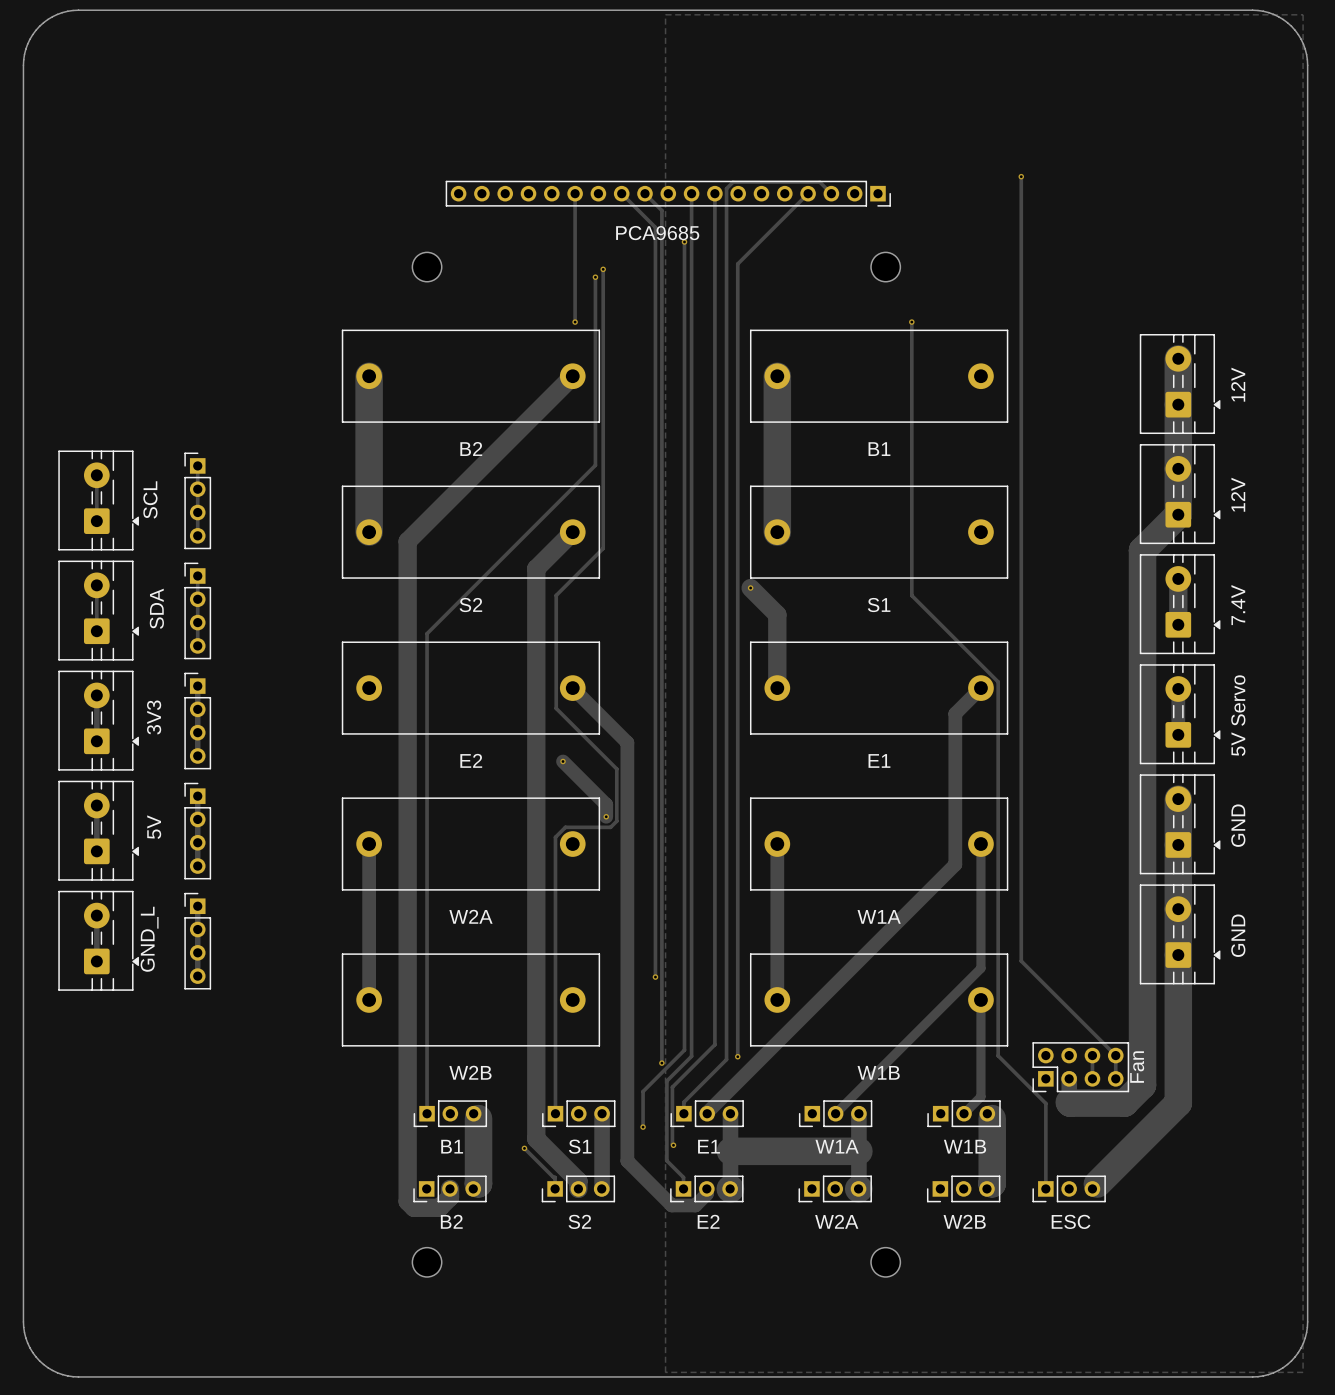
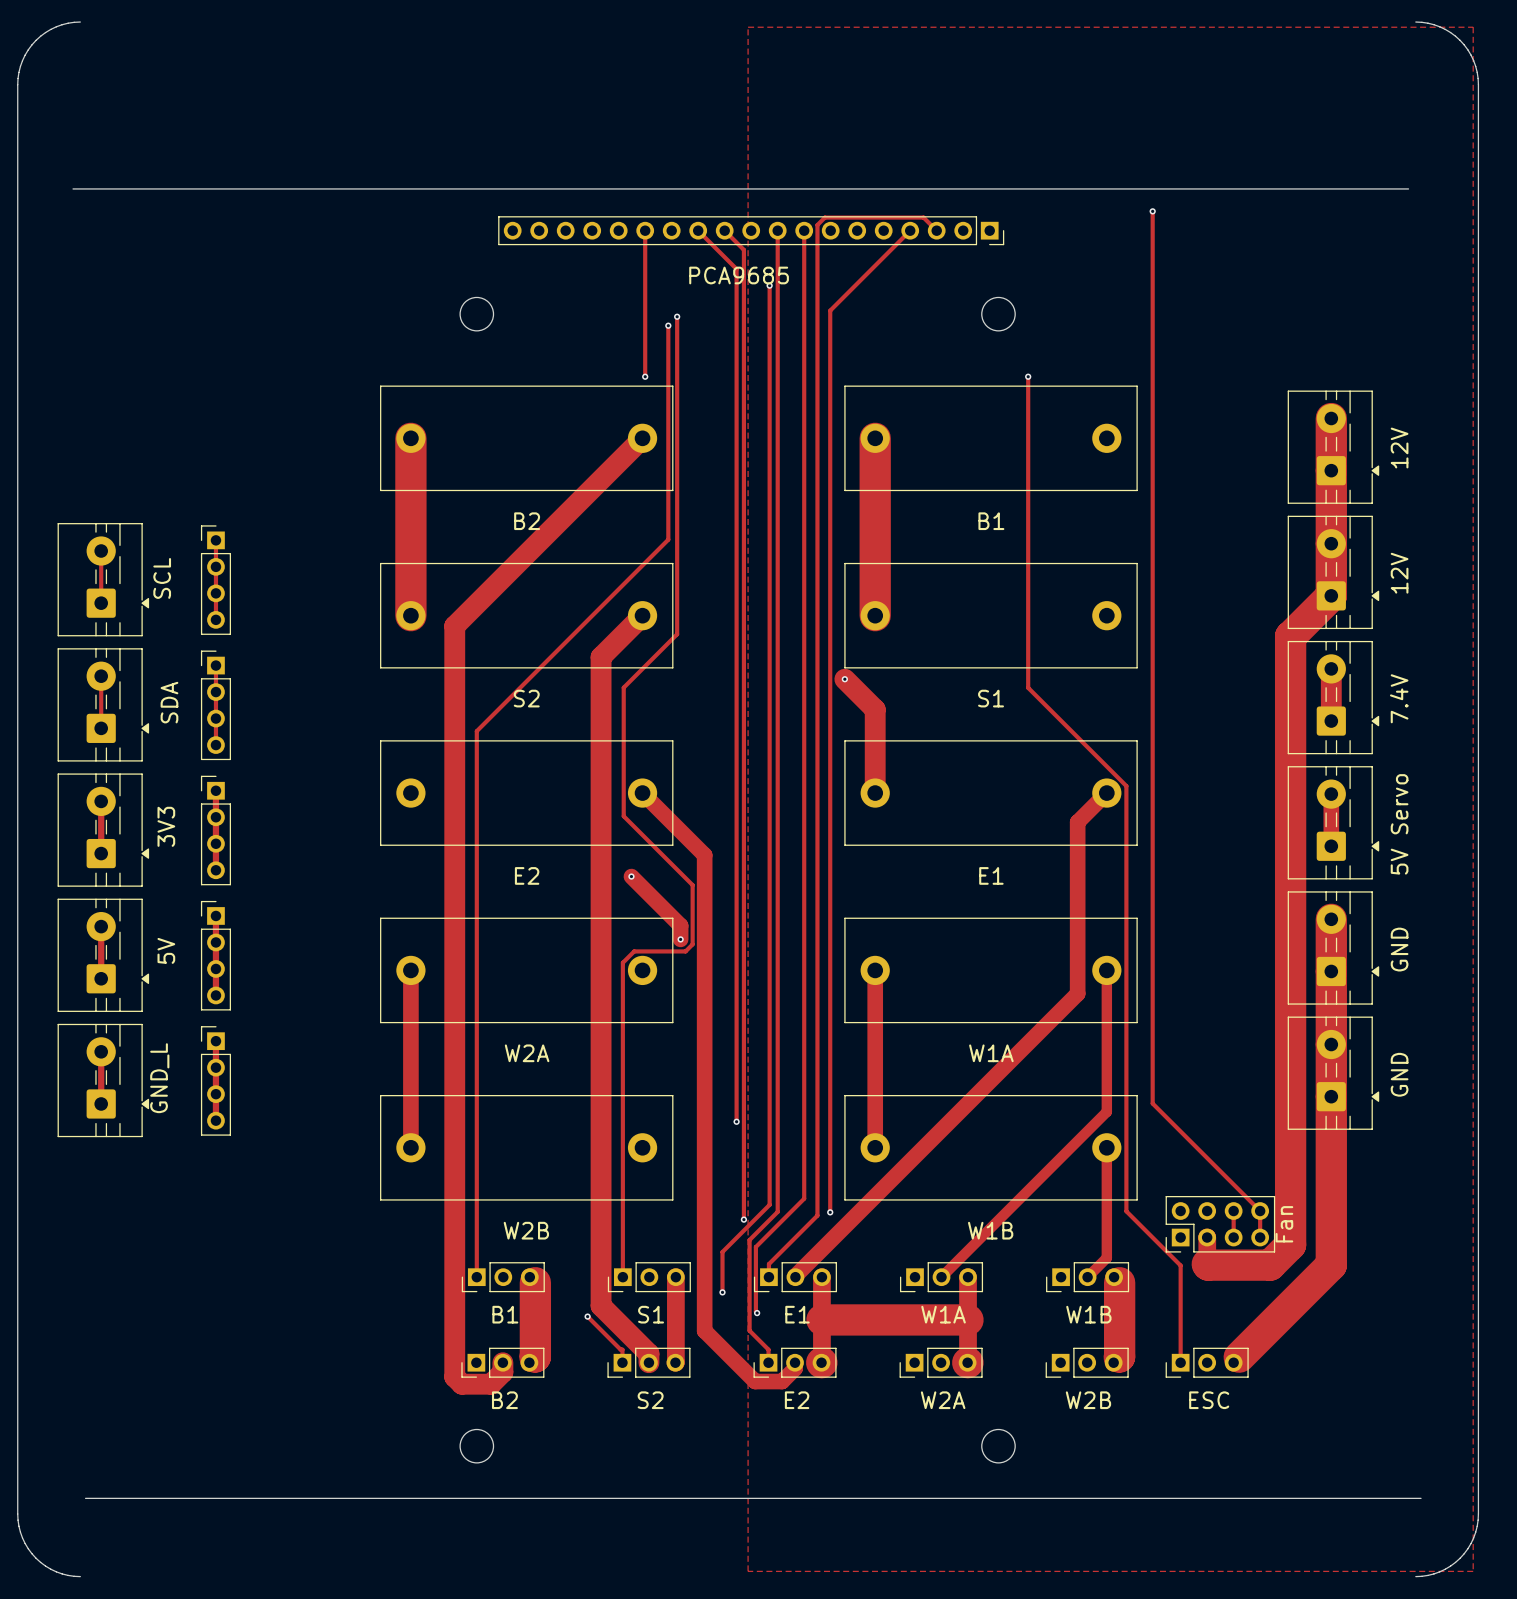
board edge: (78, 10) (1252, 10) -> (73, 188) (1408, 188)
board edge: (78, 1376) (1252, 1376) -> (85, 1498) (1421, 1498)

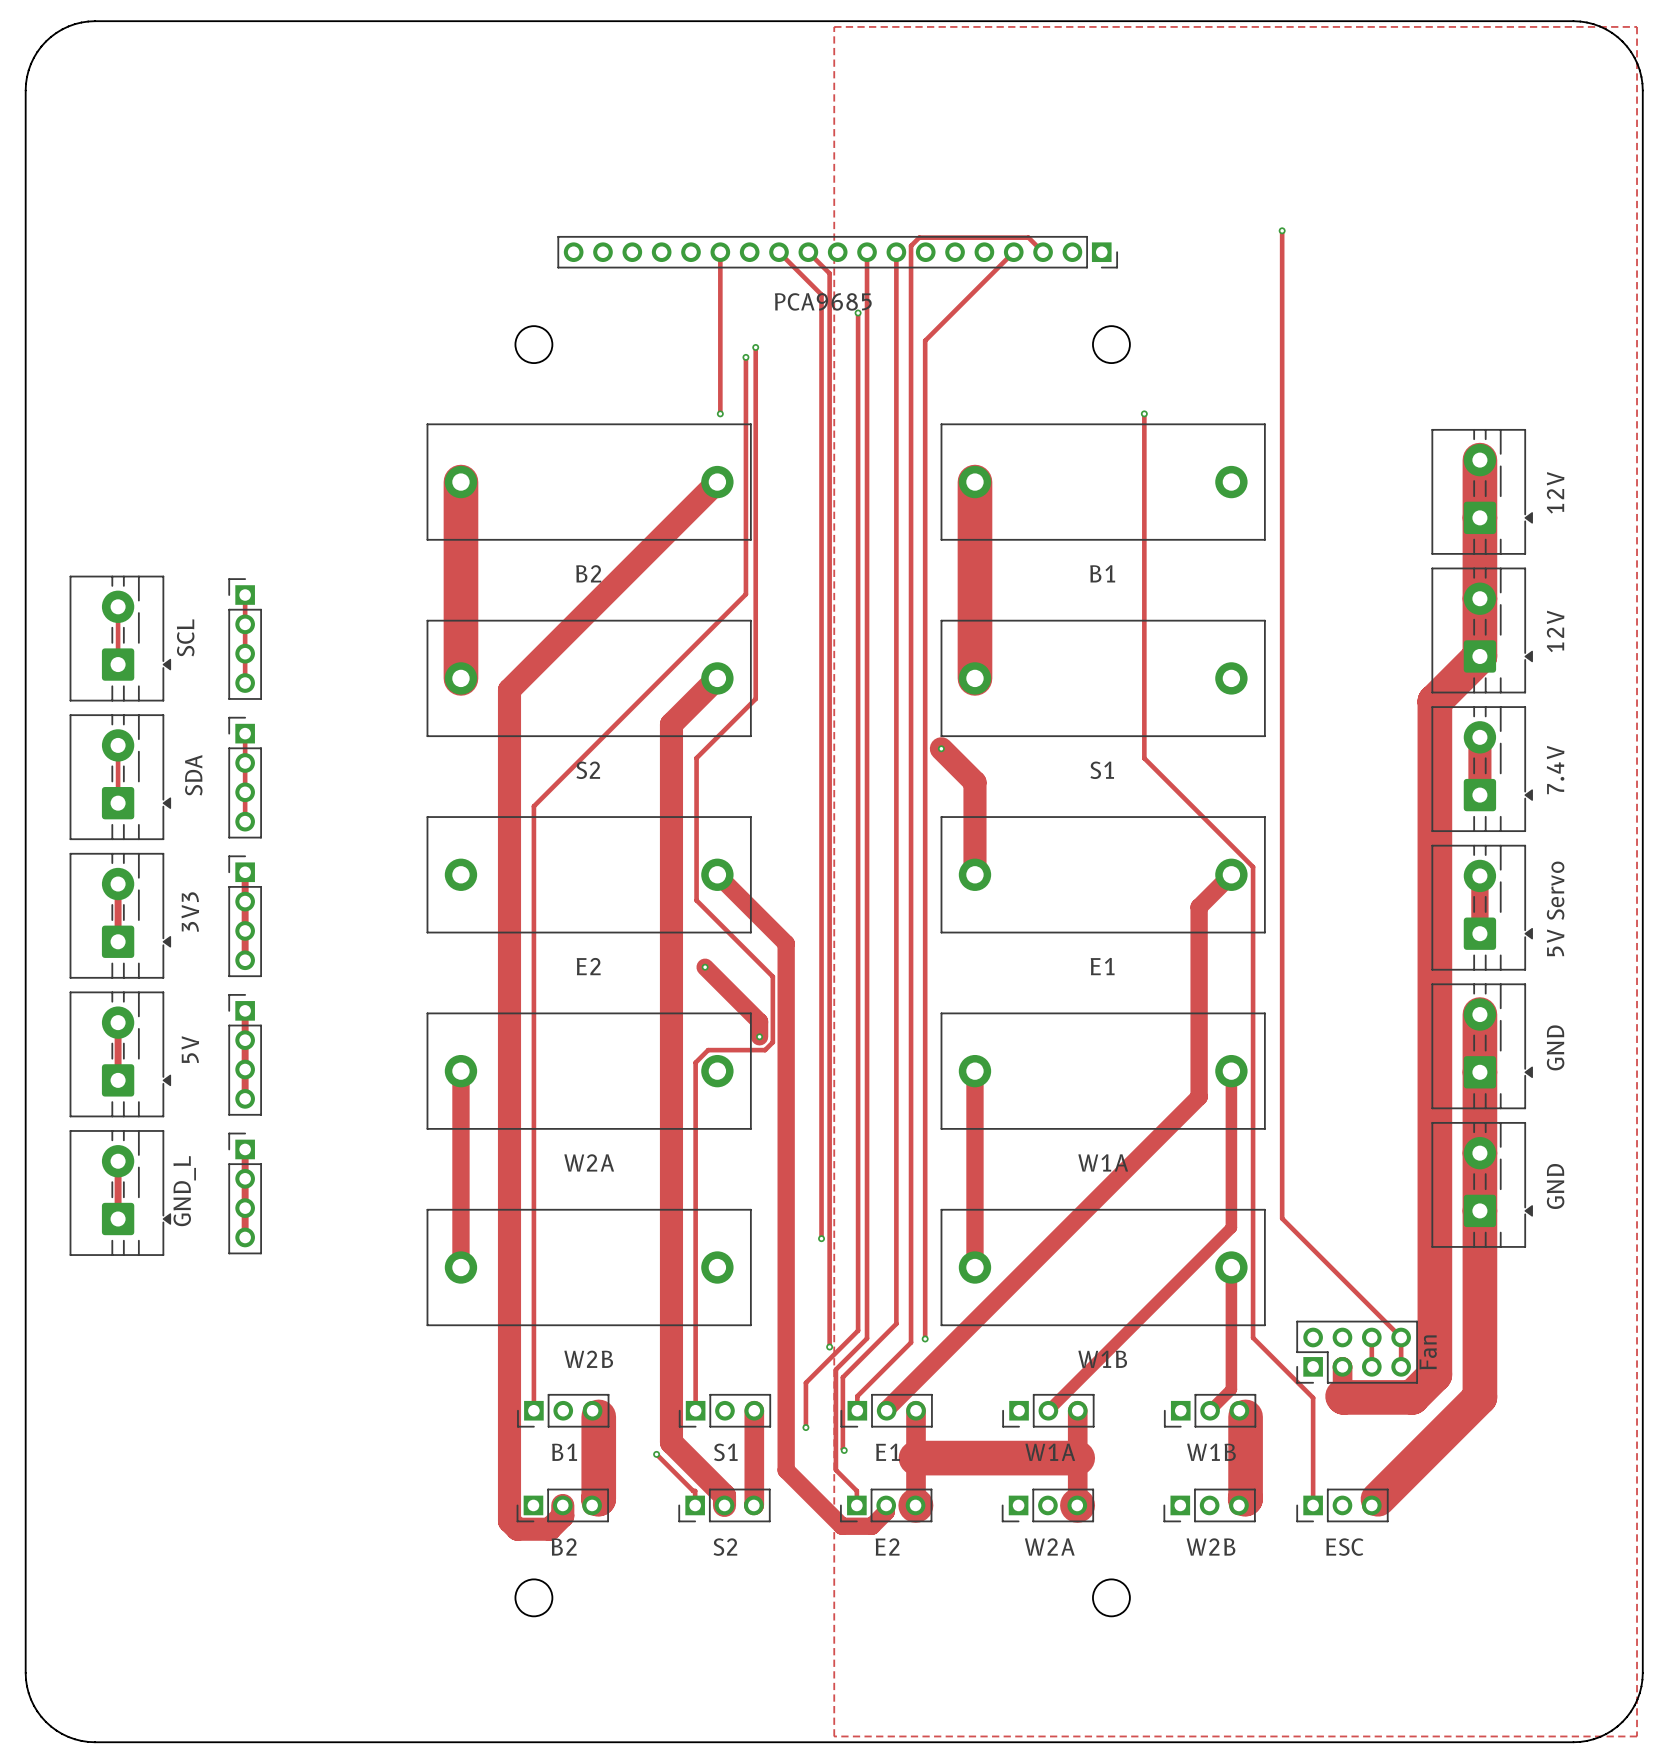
board edge: (73, 188) (1408, 188) -> (94, 21) (1573, 21)
board edge: (85, 1498) (1421, 1498) -> (94, 1742) (1573, 1742)

